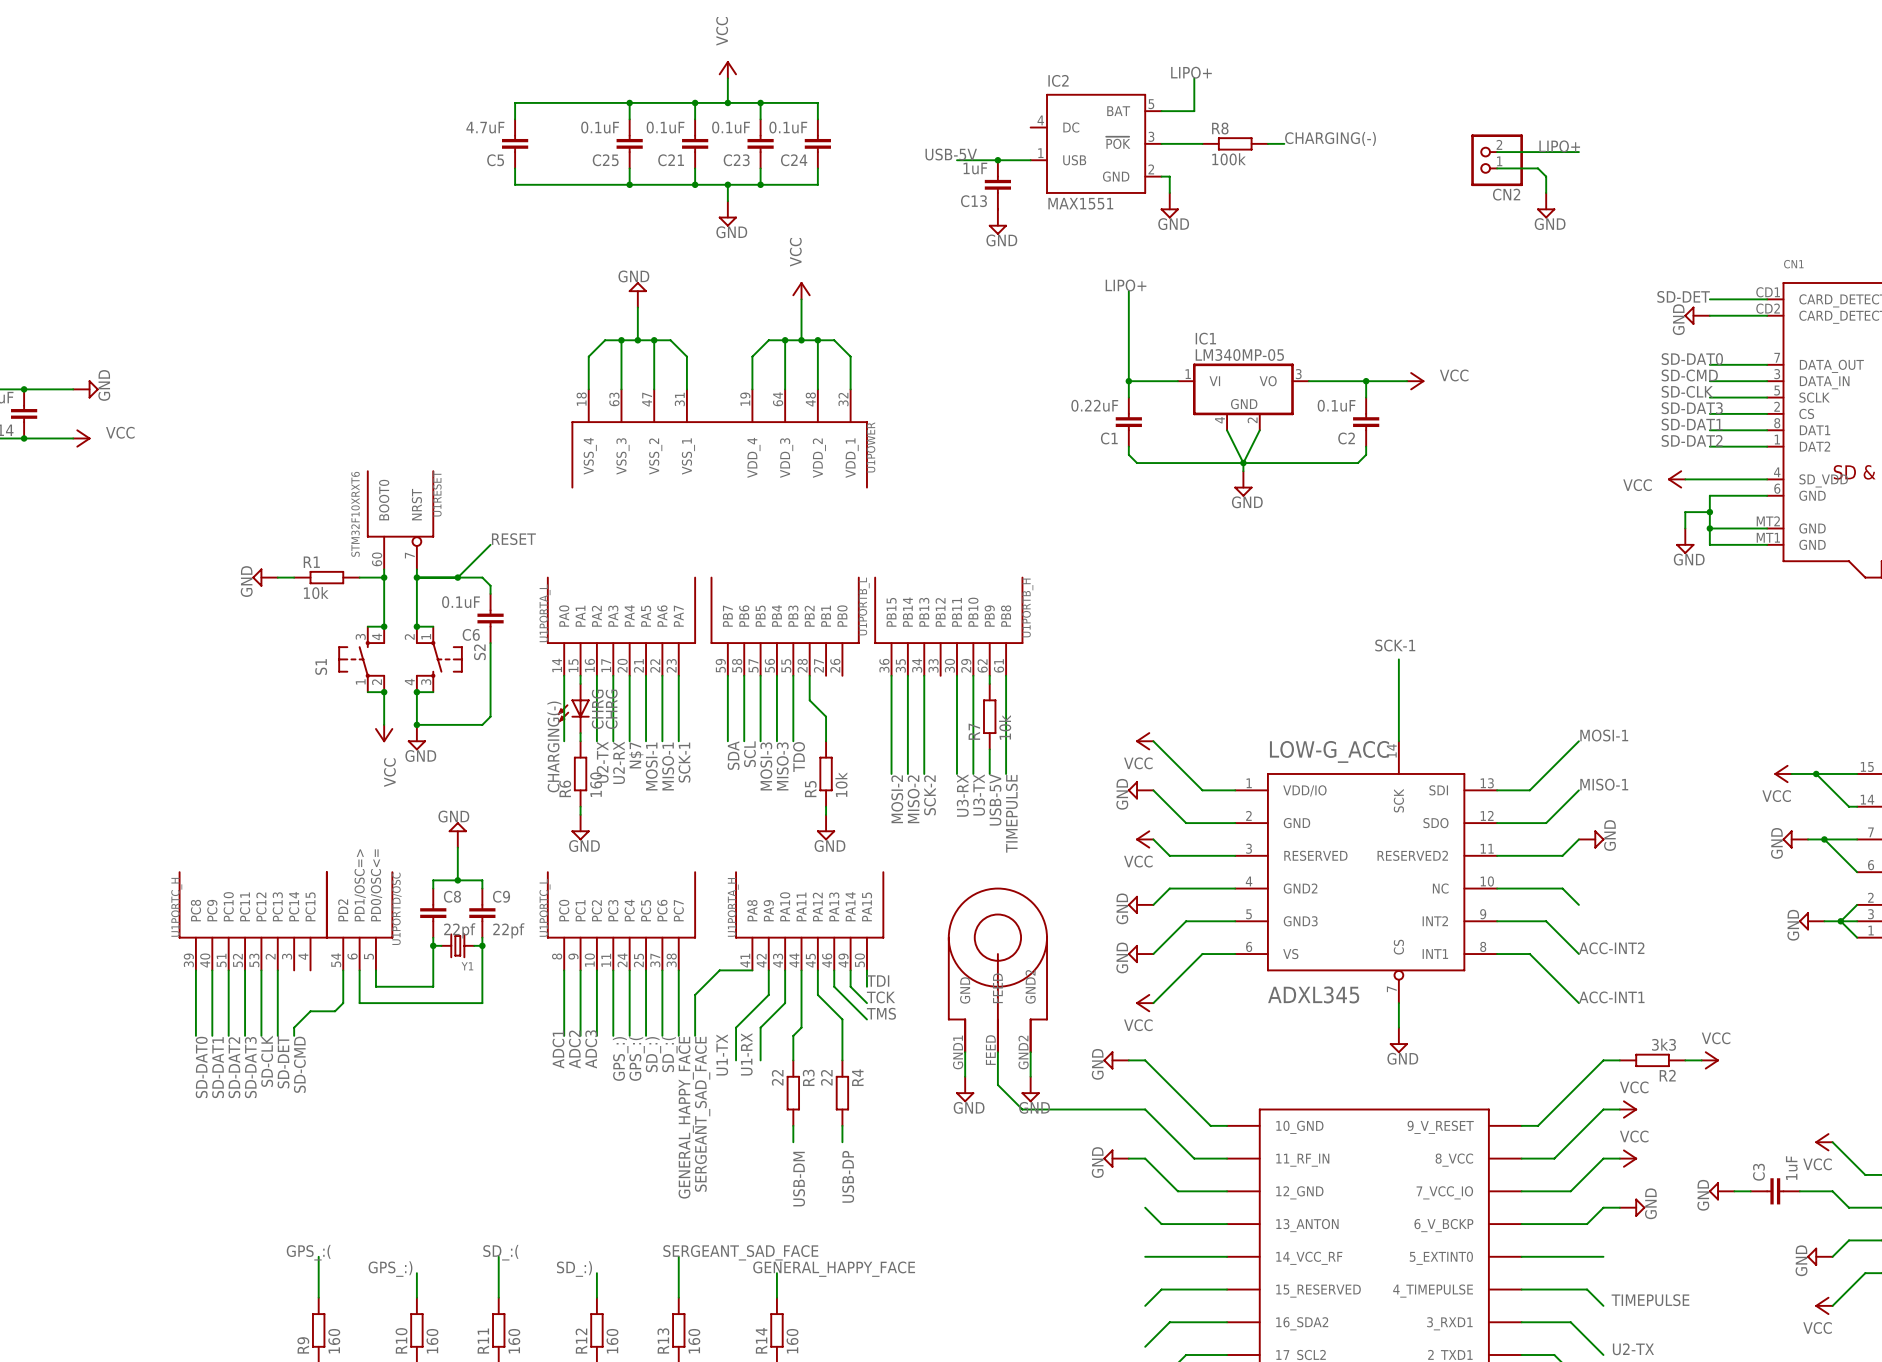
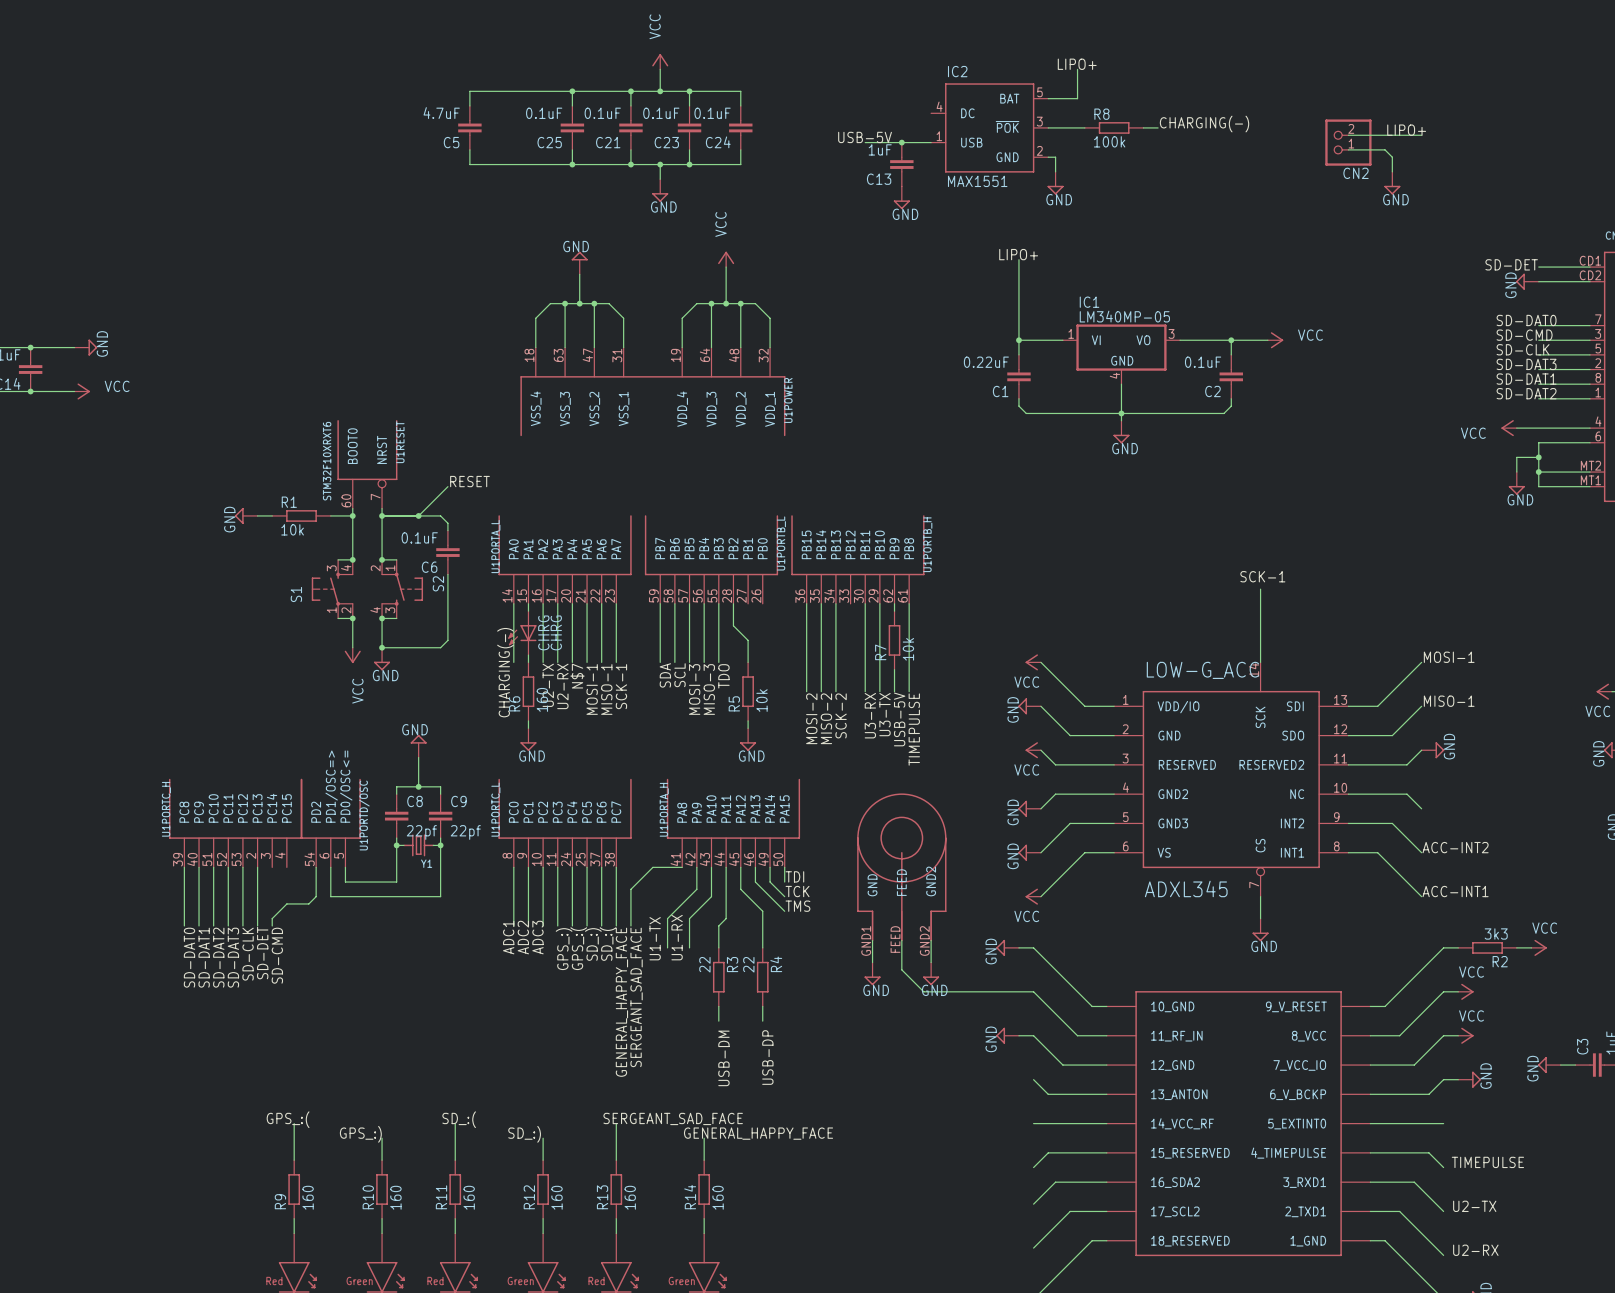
IC1 symbol: [1177, 363, 1309, 431] -> [1062, 324, 1181, 385]
wire: (1227, 430) (1243, 463) (1259, 430) -> none
wire: none -> (1121, 384) (1121, 413)

